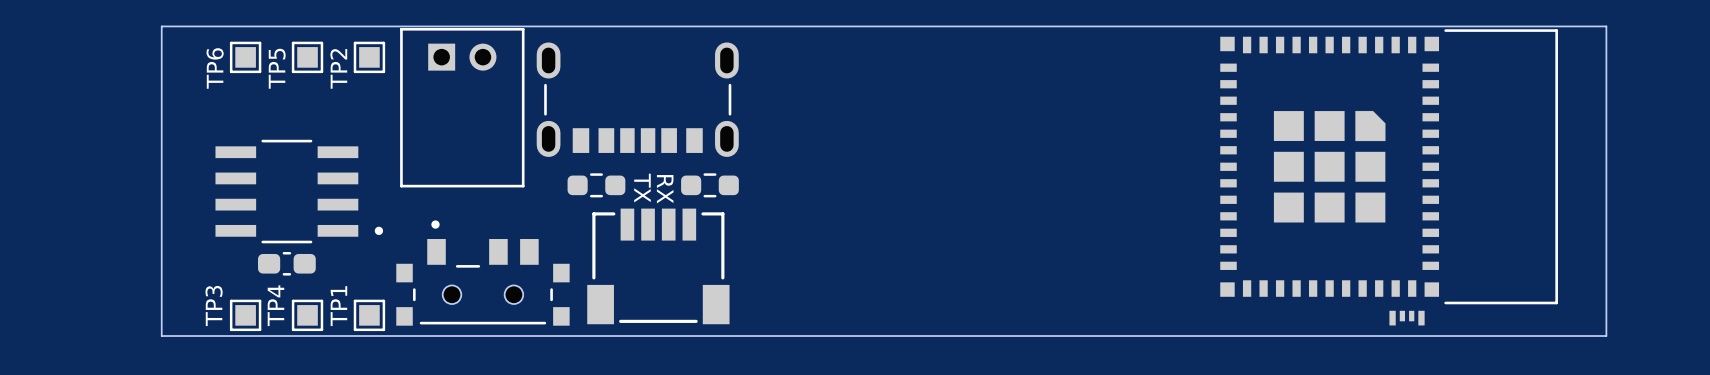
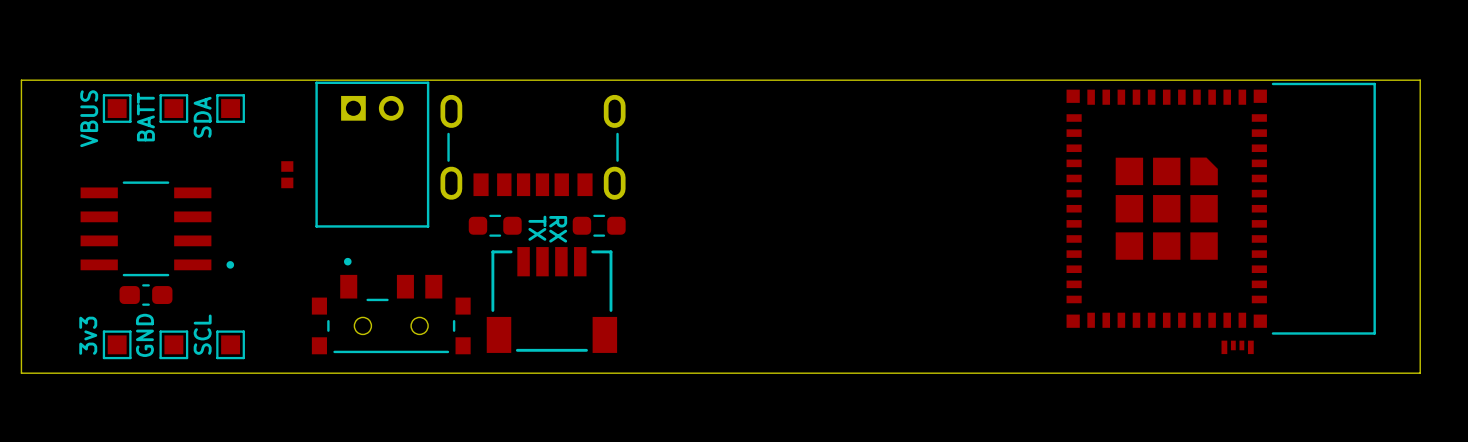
board edge: (161, 26) (161, 336) (1606, 336) -> (97, 80) (21, 80) (21, 373) (1420, 373) (1420, 363)
VBUS: none -> (117, 108)
TP2: (369, 57) -> none
TP6 name: TP6 (215, 68) -> BATT (145, 116)
TP5 name: TP5 (277, 68) -> SDA (202, 117)
part: none -> (287, 174)
part position: (299, 191) -> (157, 228)
part position: (286, 263) -> (145, 295)
TP3 name: TP3 (214, 305) -> GND (144, 335)
TP4 name: TP4 (275, 305) -> SCL (202, 334)
3v3: none -> (117, 344)
TP1: (369, 315) -> none

